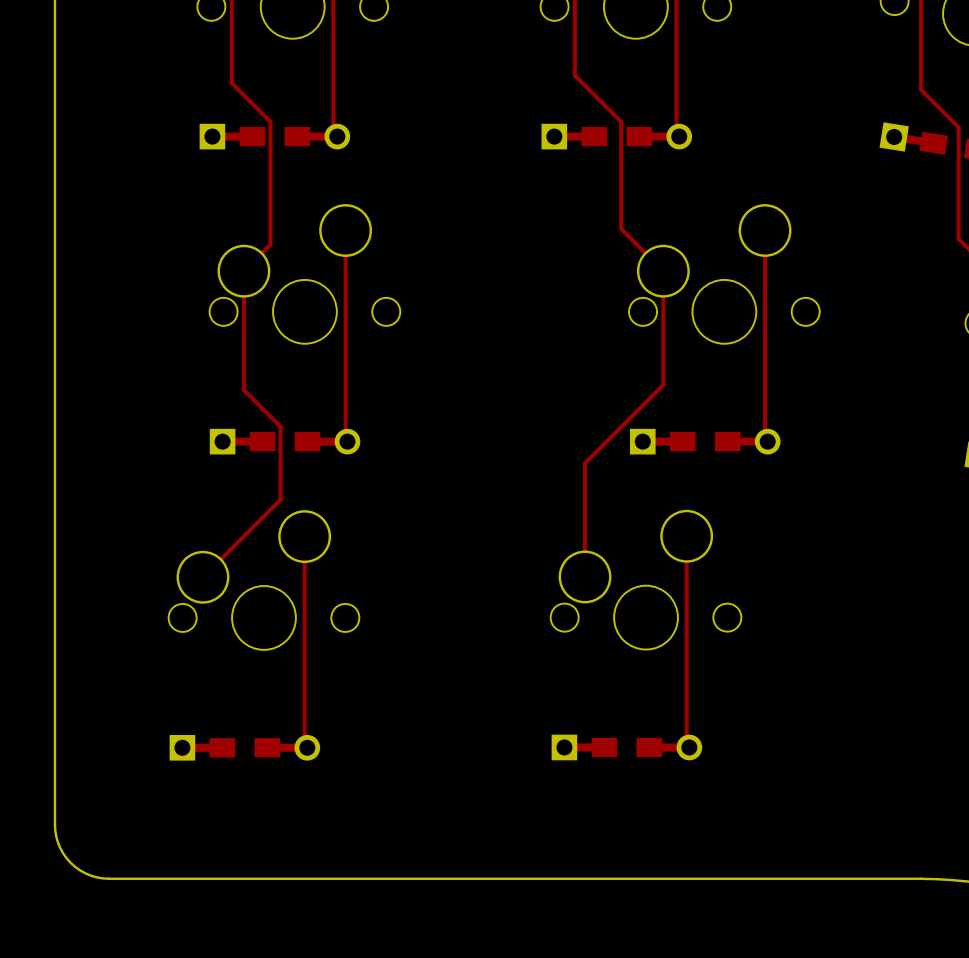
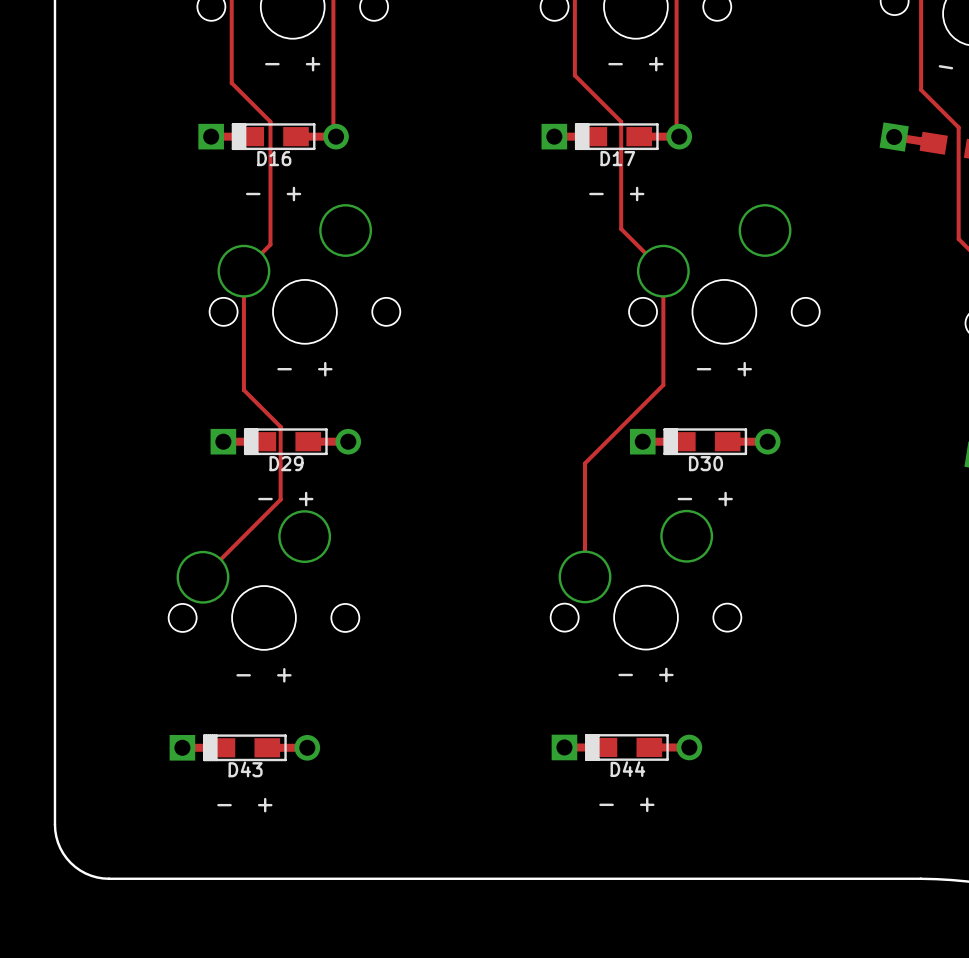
part text: none -> - (272, 64)
part text: none -> + (313, 64)
part text: none -> - (615, 64)
part text: none -> + (656, 64)
part text: none -> - (945, 67)
D16: none -> (273, 136)
part: (274, 136) -> none
part: (616, 136) -> none
D17: none -> (616, 136)
track: (345, 230) (346, 441) -> none
track: (765, 230) (766, 441) -> none
part text: none -> - (284, 369)
part text: none -> + (325, 369)
part text: none -> - (704, 369)
part text: none -> + (744, 369)
part: (285, 441) -> none
D29: none -> (285, 441)
part: (705, 441) -> none
D30: none -> (705, 441)
track: (304, 536) (305, 747) -> none
track: (686, 536) (687, 747) -> none
part text: none -> - (625, 674)
part text: none -> + (666, 674)
part text: none -> - (243, 675)
part text: none -> + (284, 675)
part: (244, 747) -> none
D43: none -> (244, 747)
part: (626, 747) -> none
D44: none -> (626, 747)

